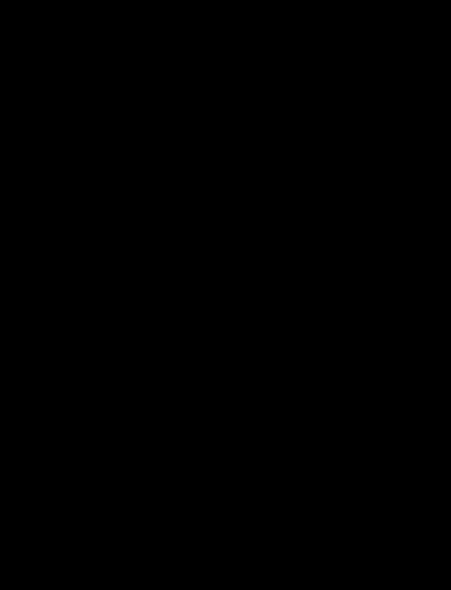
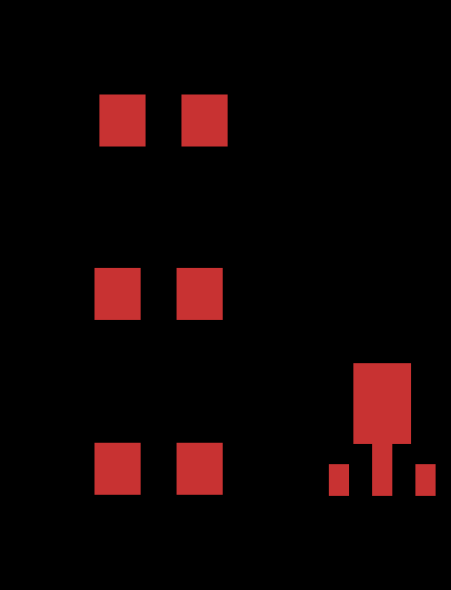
part: none -> (163, 120)
part: none -> (158, 293)
part: none -> (382, 429)
part: none -> (158, 468)

